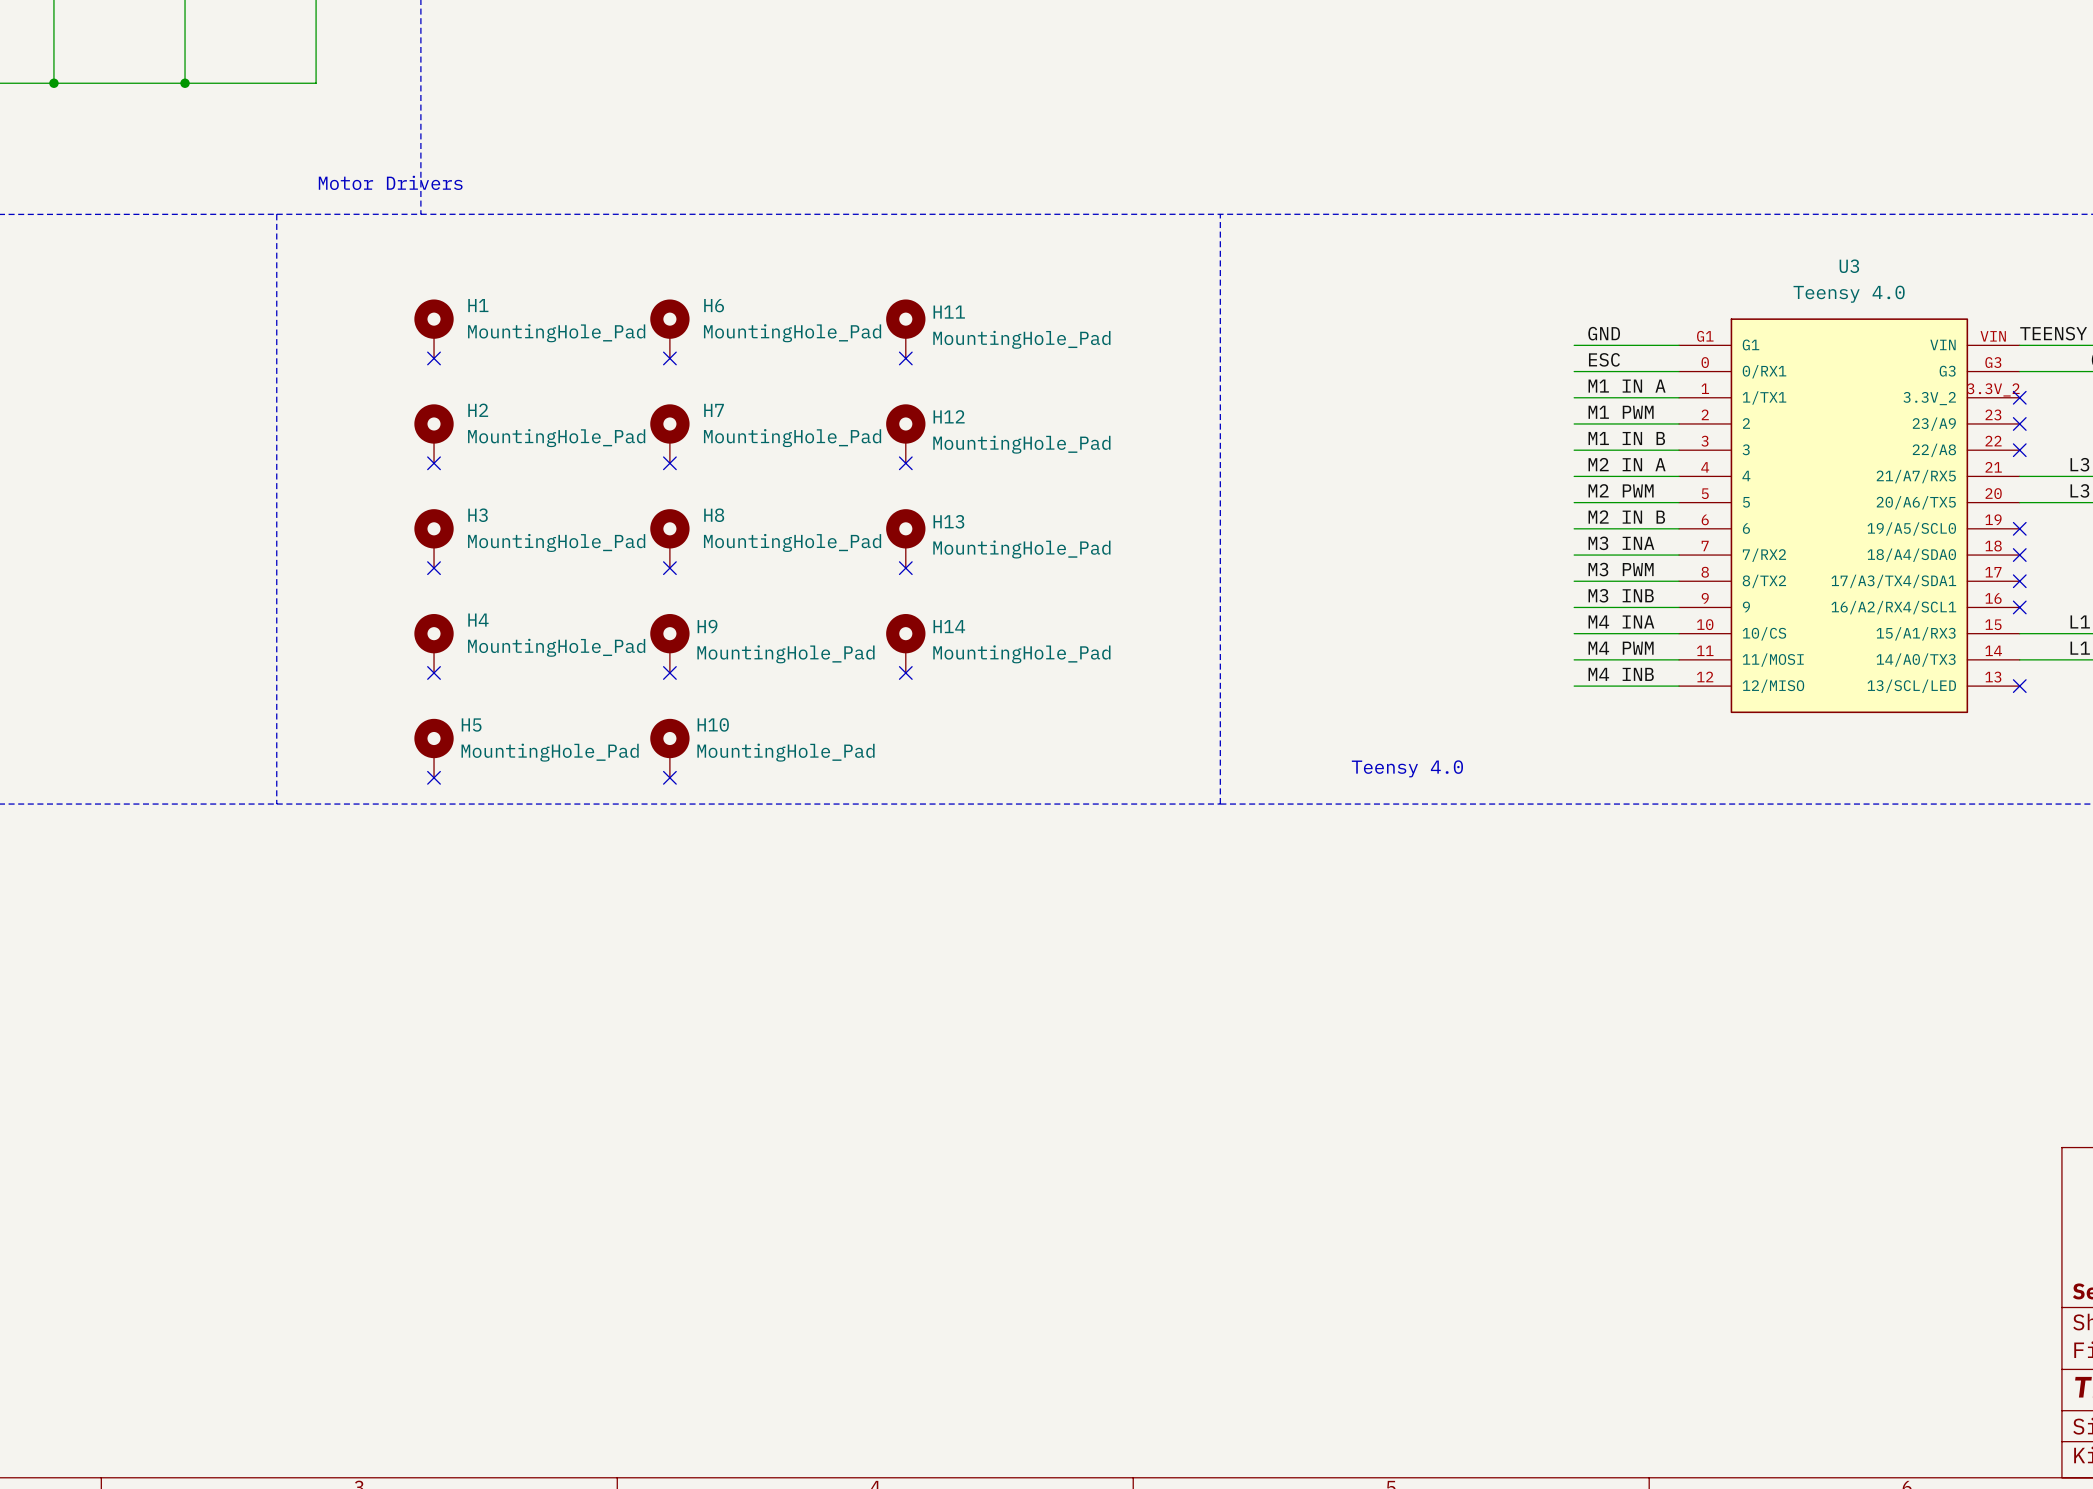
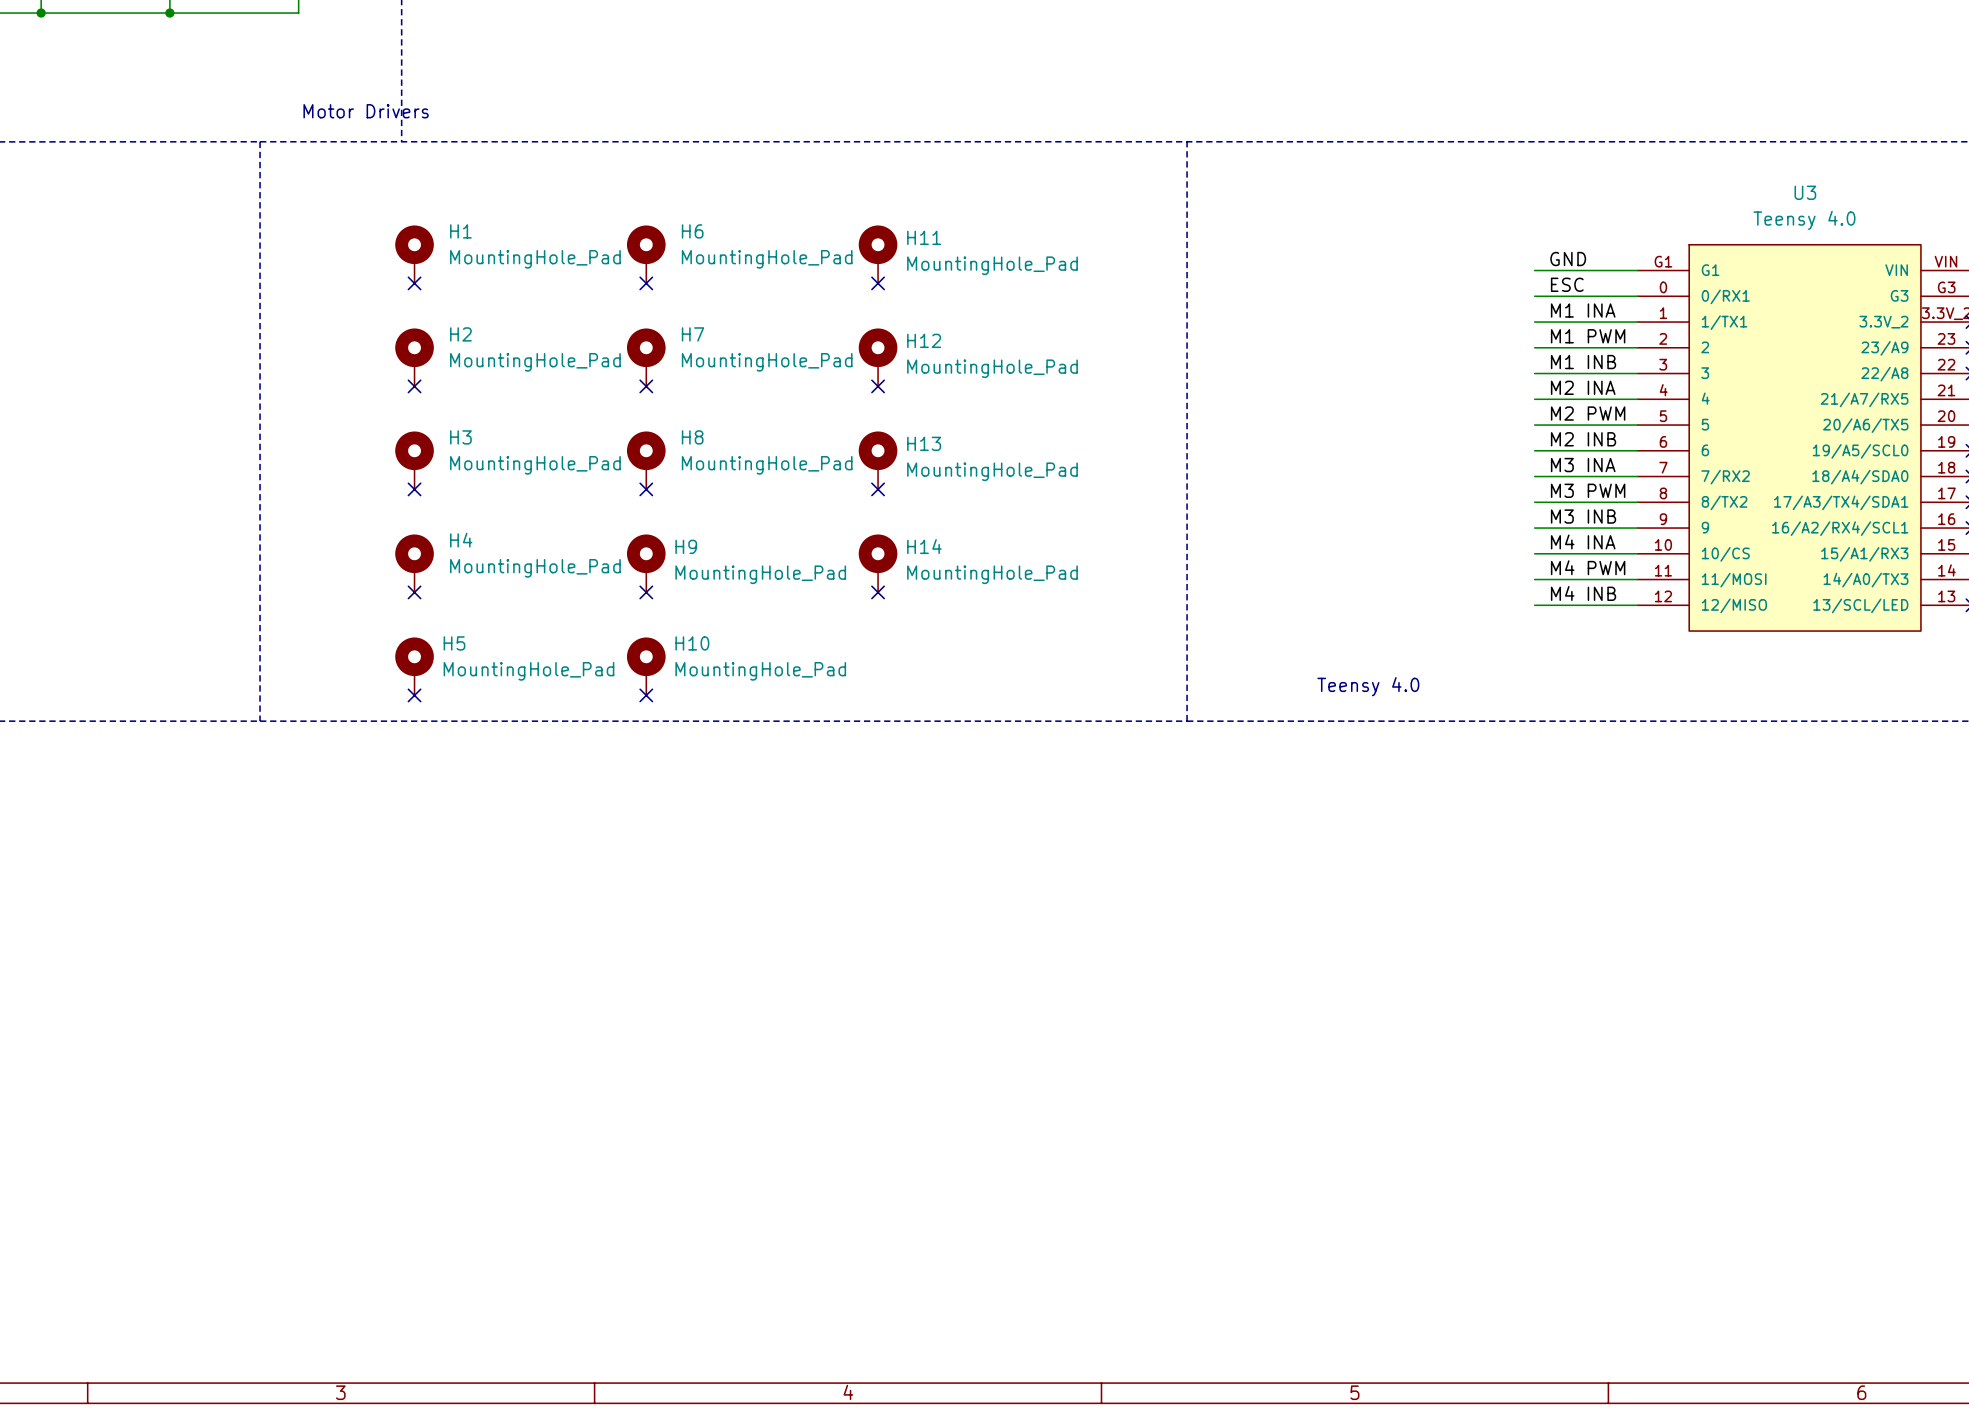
label: M1 IN A (1627, 386) -> M1 INA (1583, 310)
label: M1 IN B (1626, 438) -> M1 INB (1583, 362)
label: M2 IN A (1627, 464) -> M2 INA (1583, 387)
label: M2 IN B (1626, 517) -> M2 INB (1583, 439)

